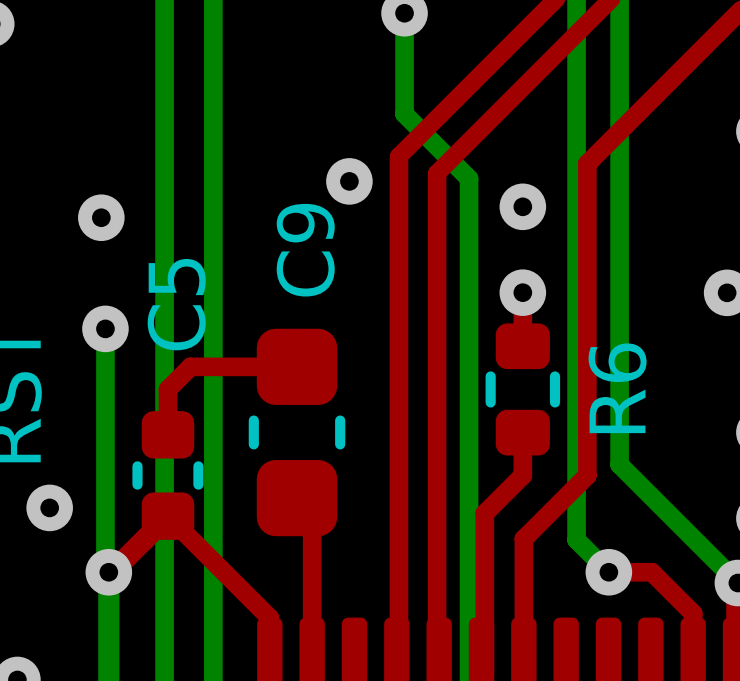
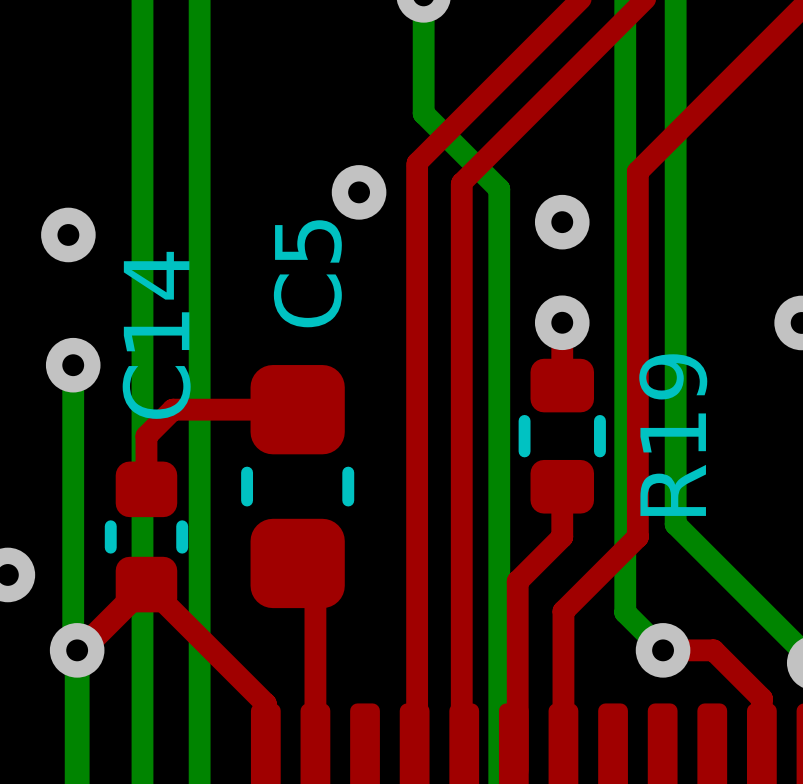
C9 name: C9 (305, 250) -> C5 (307, 273)
C5 name: C5 (176, 304) -> C14 (156, 335)
R6 name: R6 (617, 388) -> R19 (673, 435)

